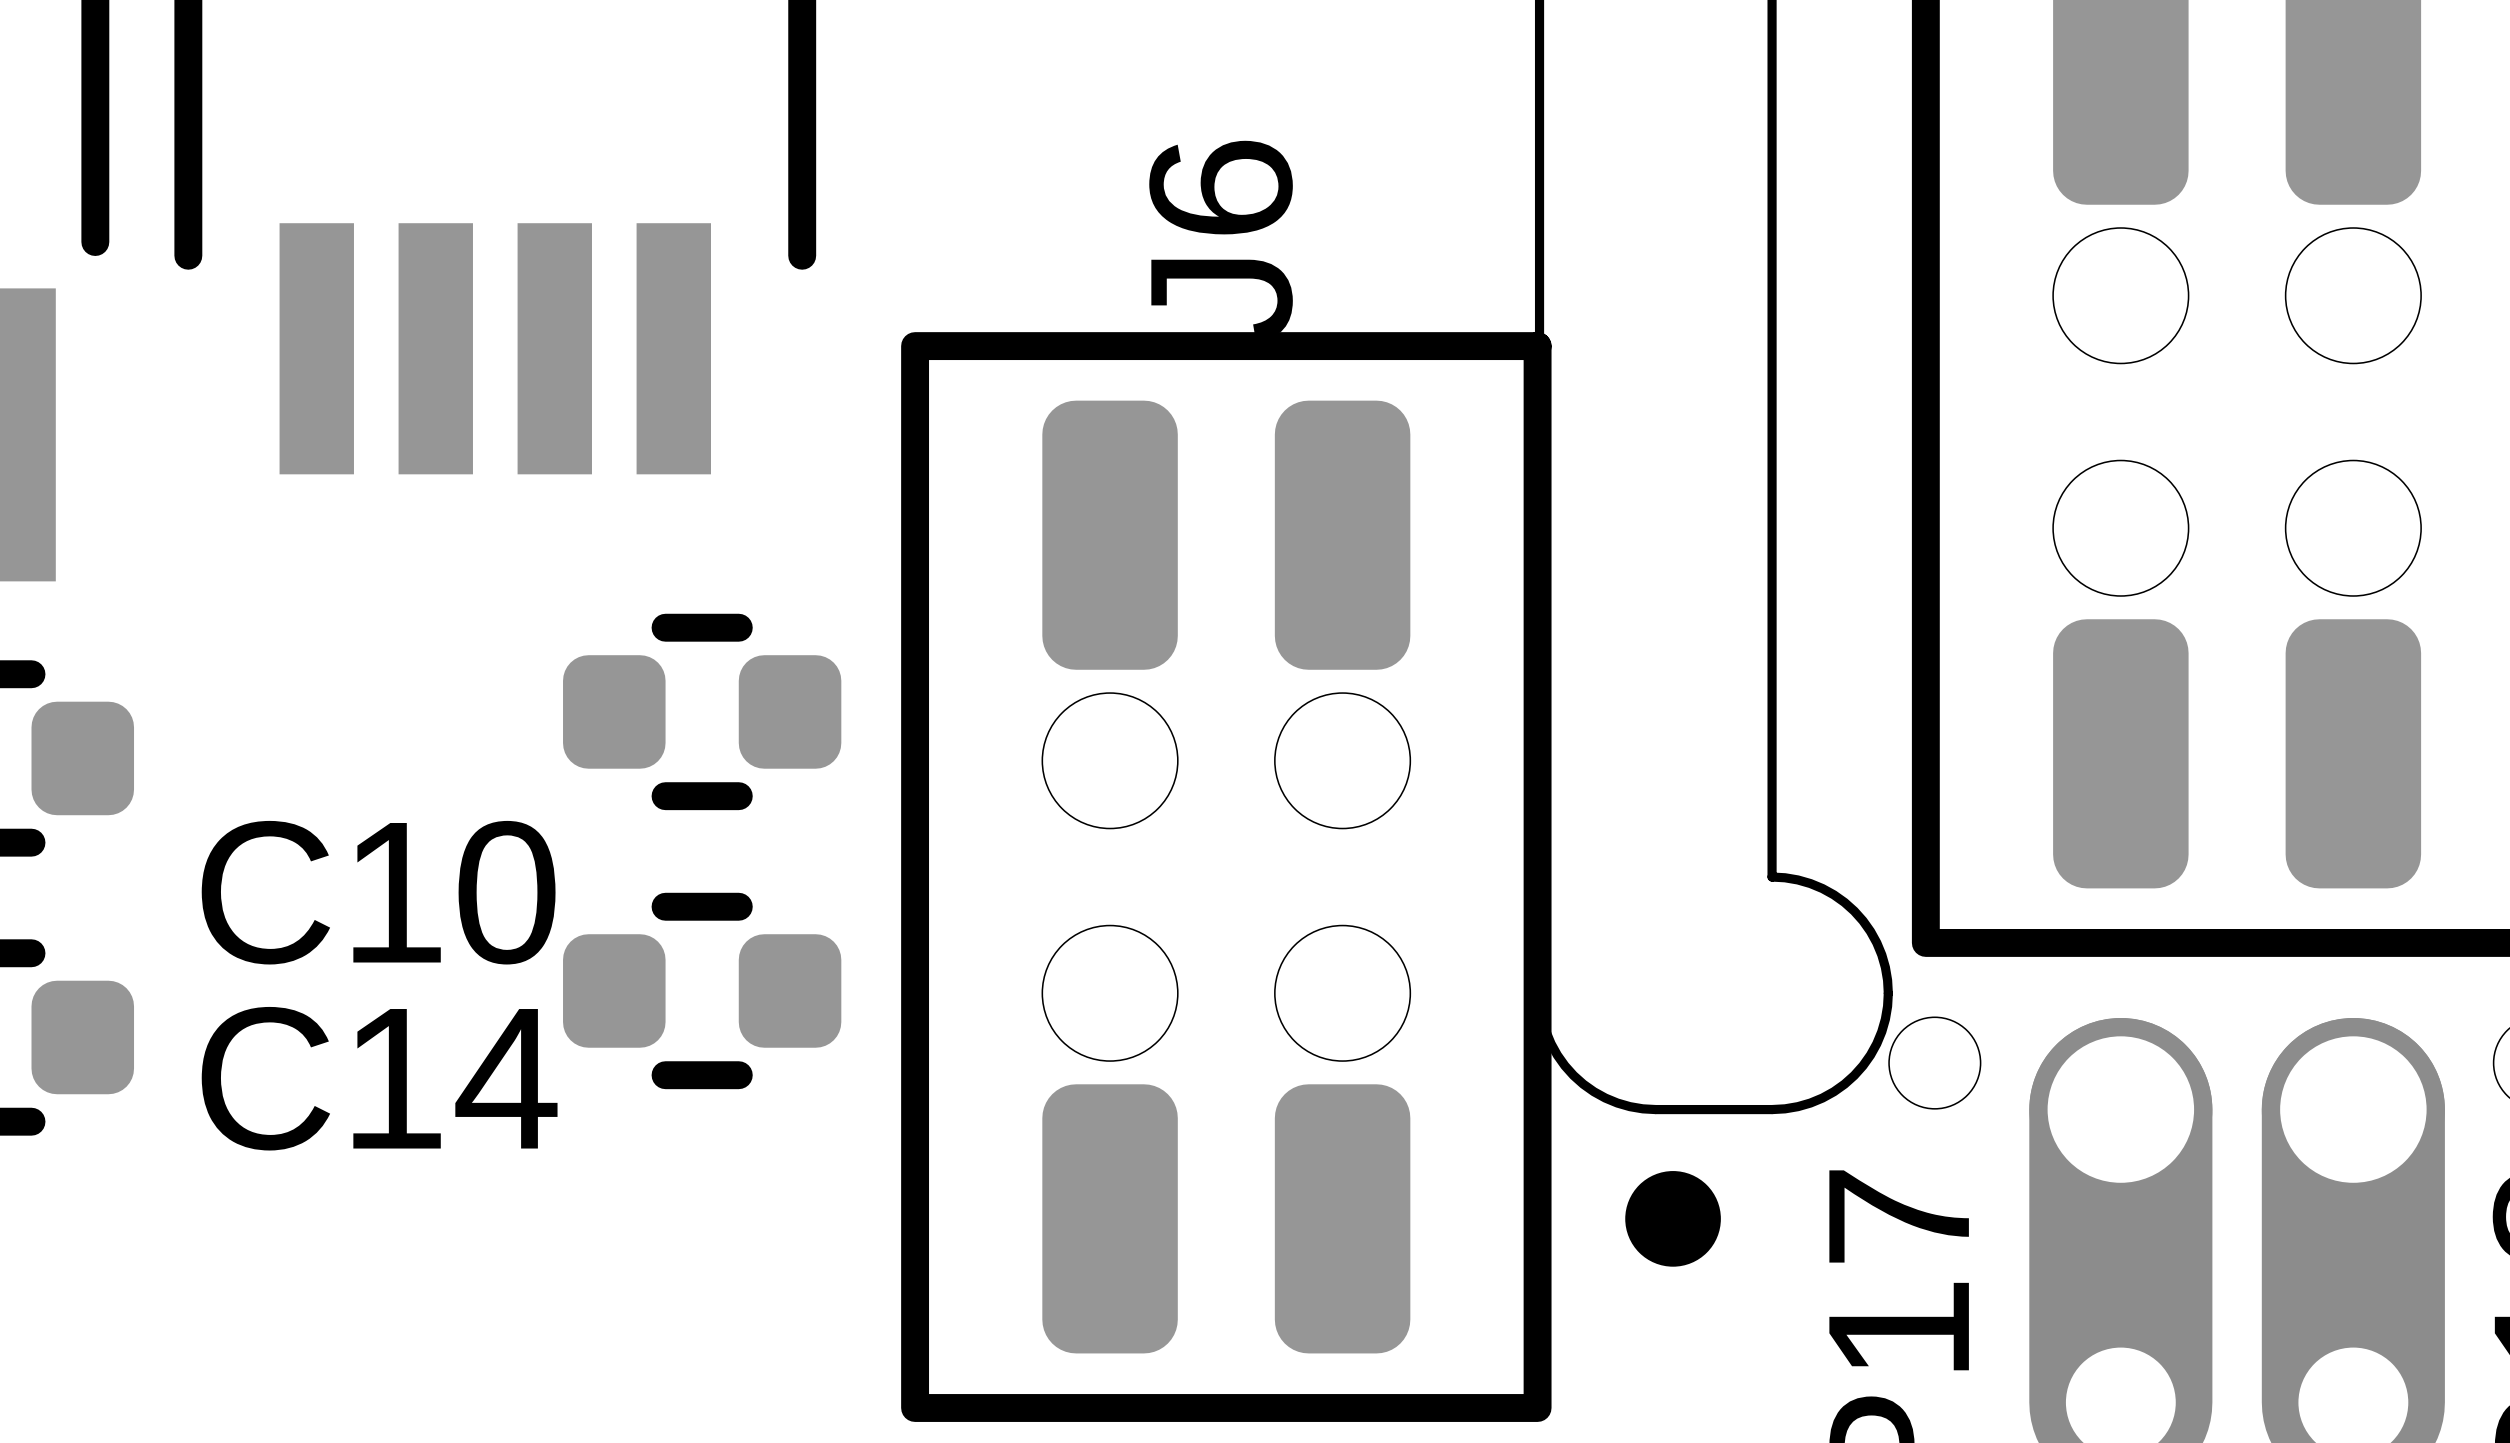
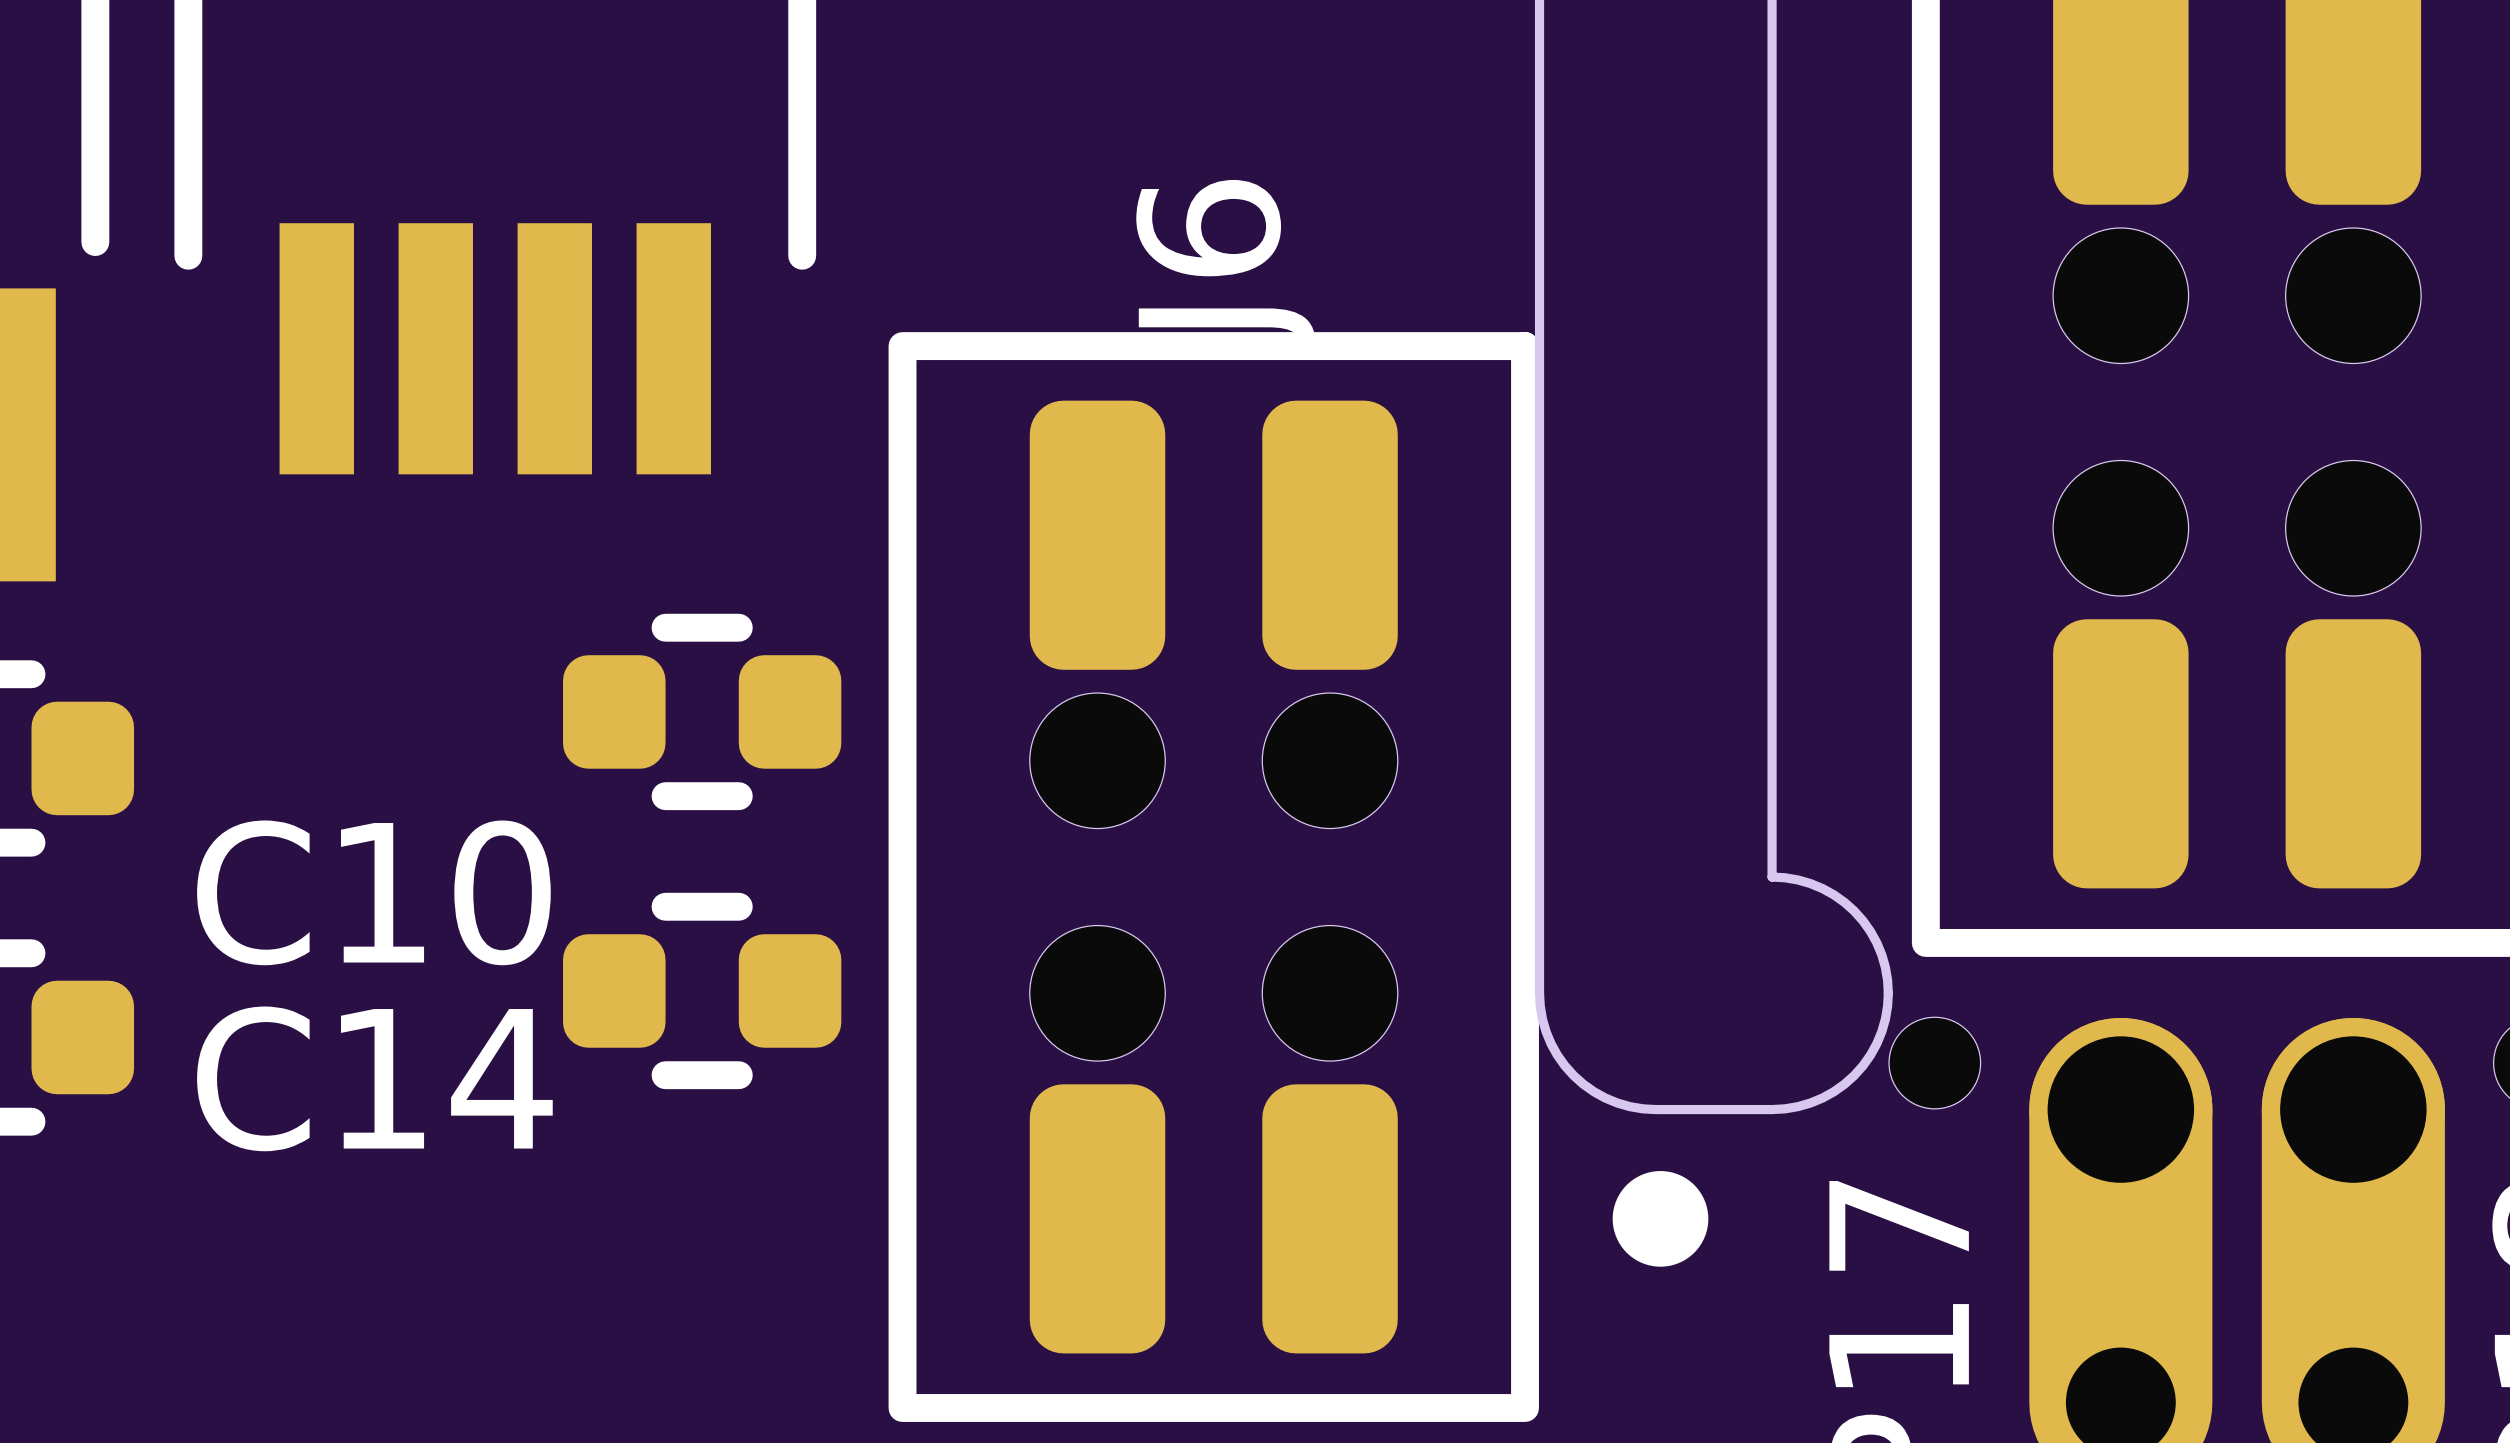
J6 position: (1311, 877) -> (1298, 877)

